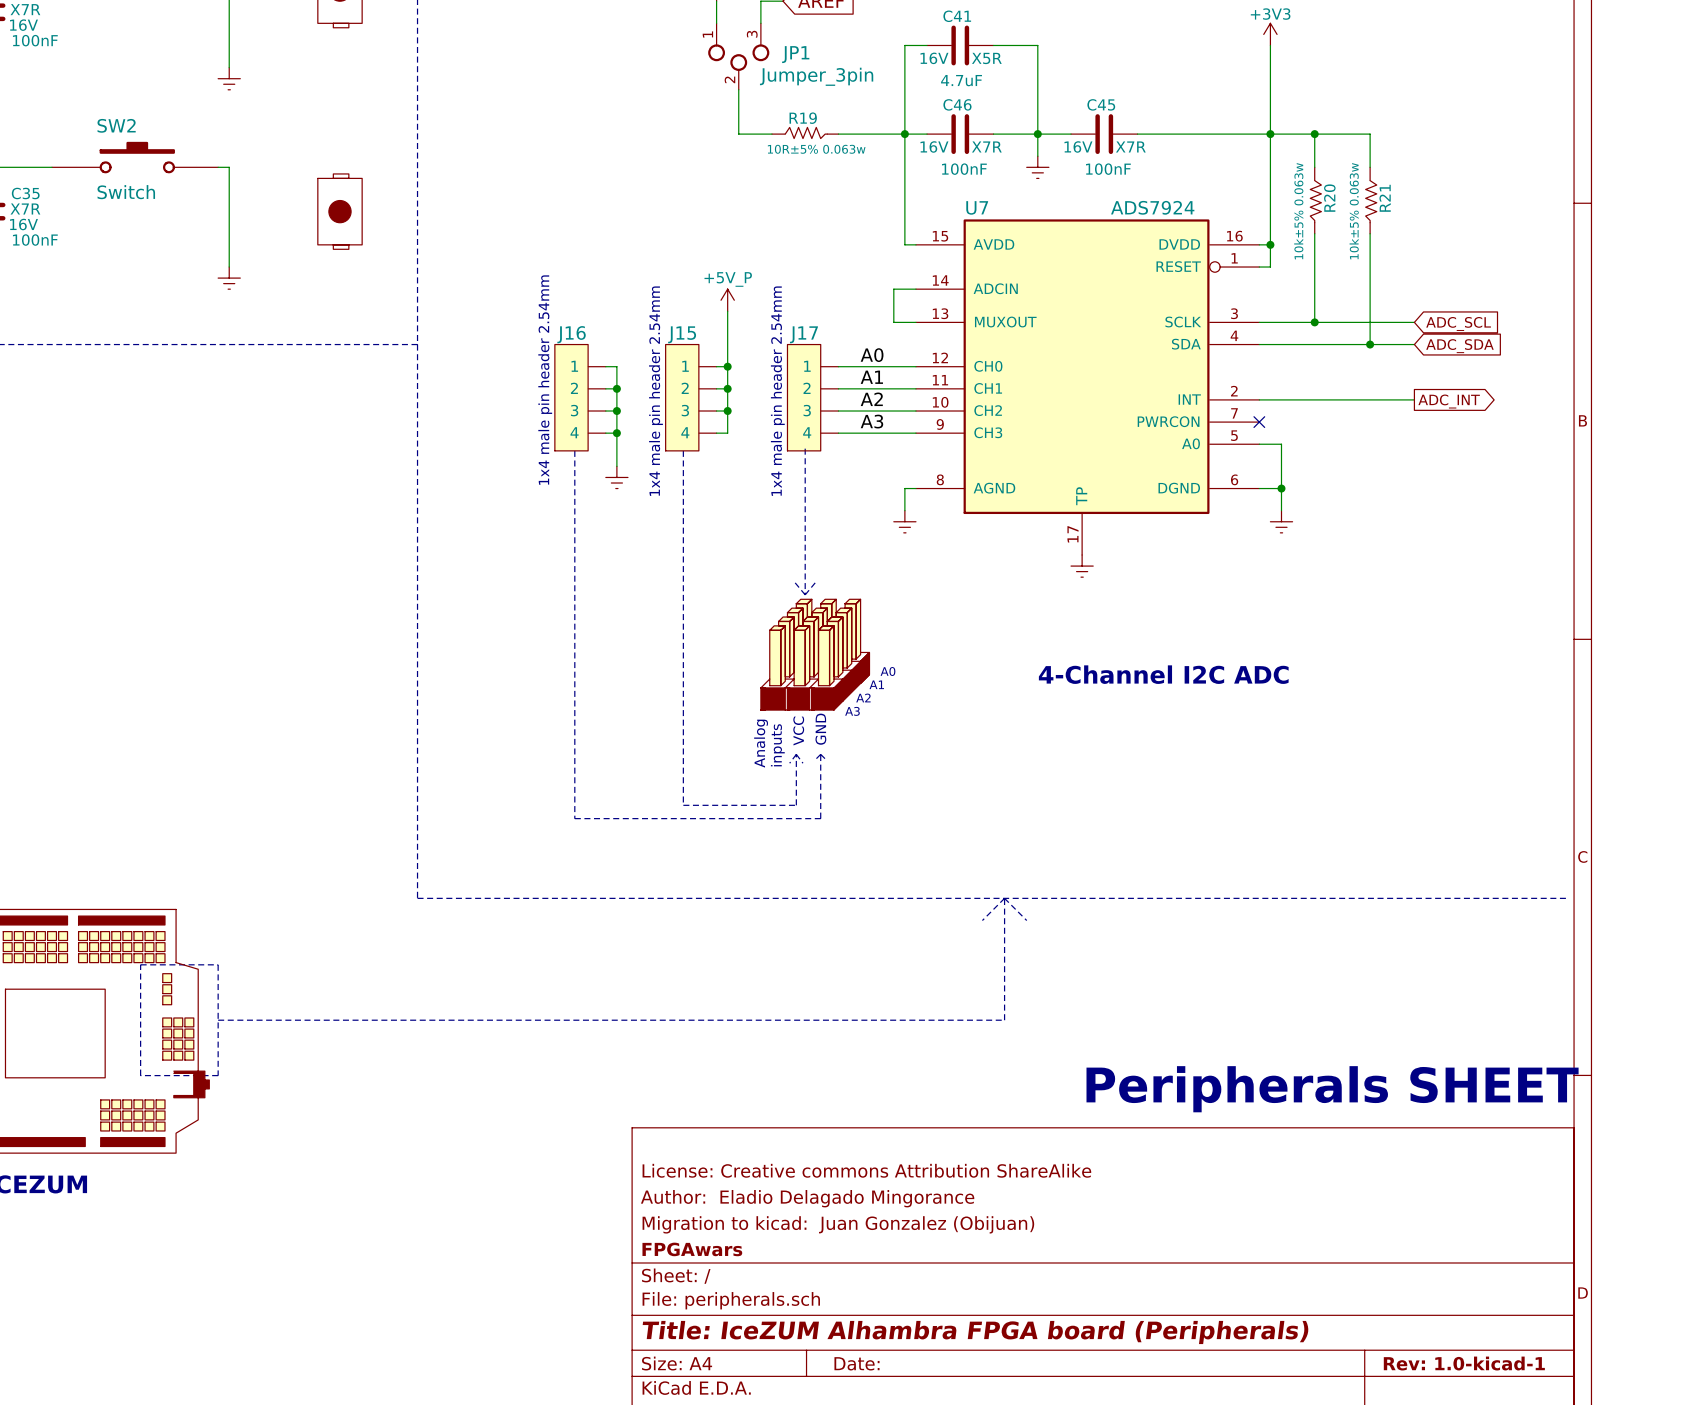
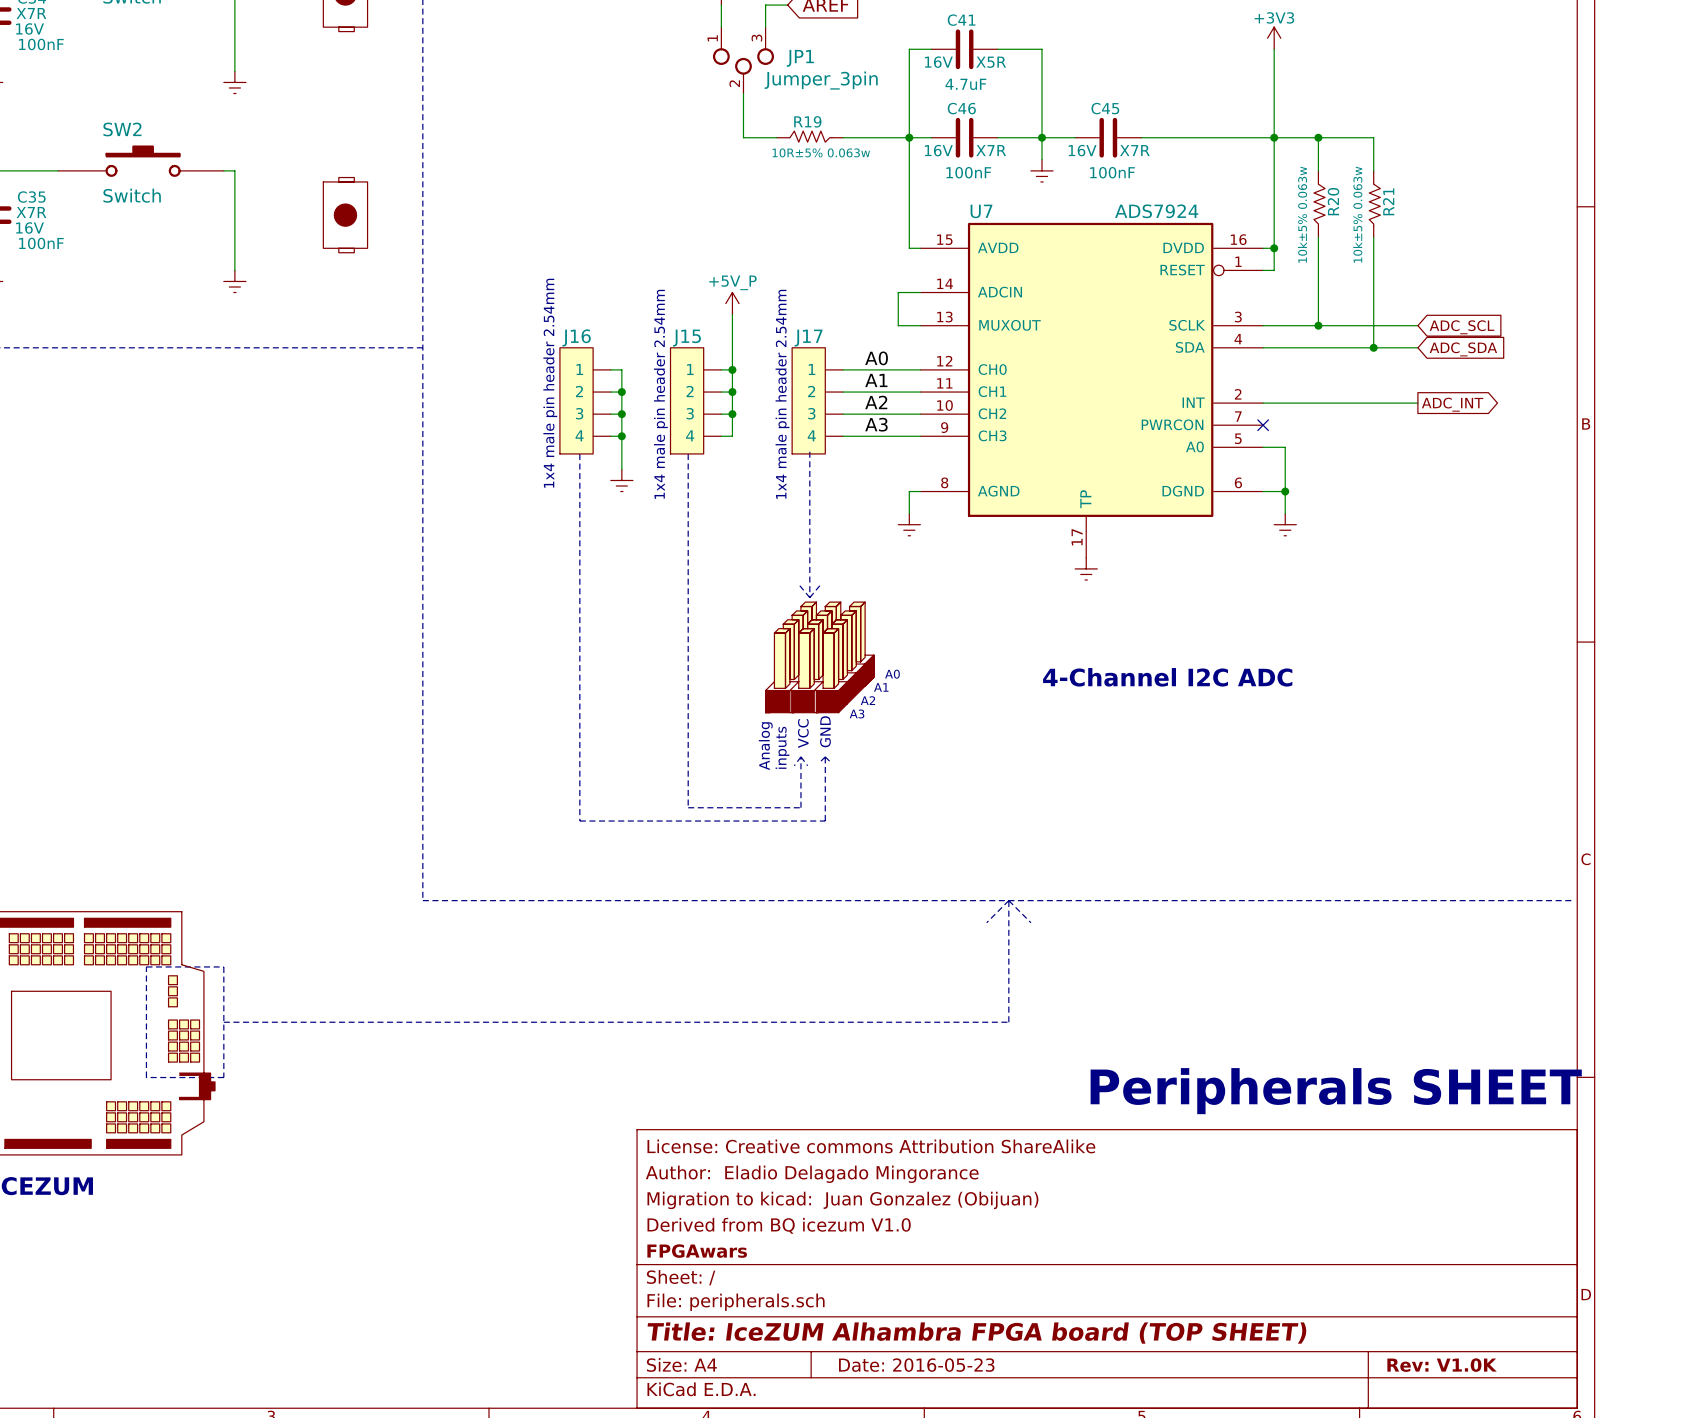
title block: none -> License: Creative commons Attribution ShareAlike (871, 1146)
title block: License: Creative commons Attribution ShareAlike (866, 1170) -> Author: Eladio Delagado Mingorance (812, 1174)
title block: Author: Eladio Delagado Mingorance (807, 1198) -> Migration to kicad: Juan Gonzalez (Obijuan) (842, 1200)
title block: Migration to kicad: Juan Gonzalez (Obijuan) (838, 1224) -> Derived from BQ icezum V1.0 (779, 1225)
title block: Title: IceZUM Alhambra FPGA board (Peripherals) (975, 1332) -> Title: IceZUM Alhambra FPGA board (TOP SHEET) (977, 1333)
title block: Date: (856, 1363) -> Date: 2016-05-23 (916, 1365)
title block: Rev: 1.0-kicad-1 (1464, 1363) -> Rev: V1.0K (1442, 1365)

